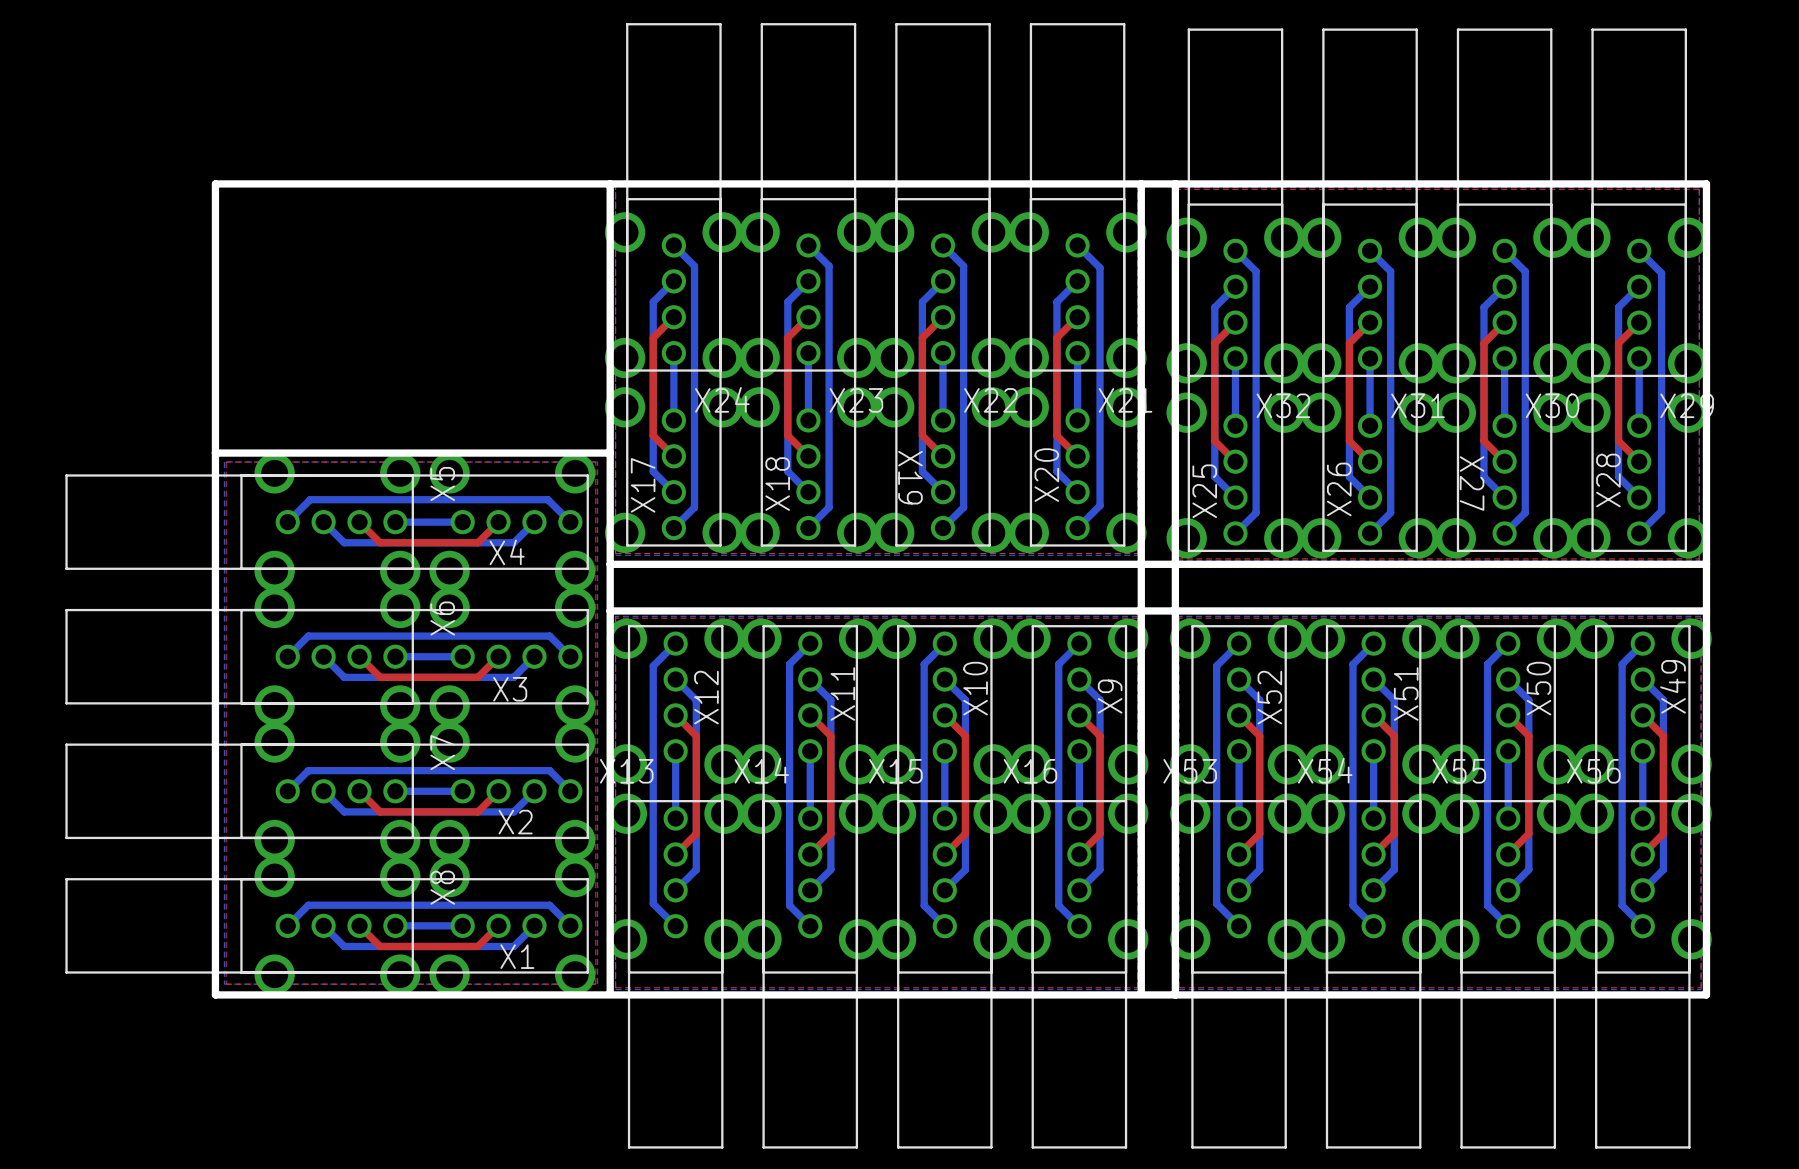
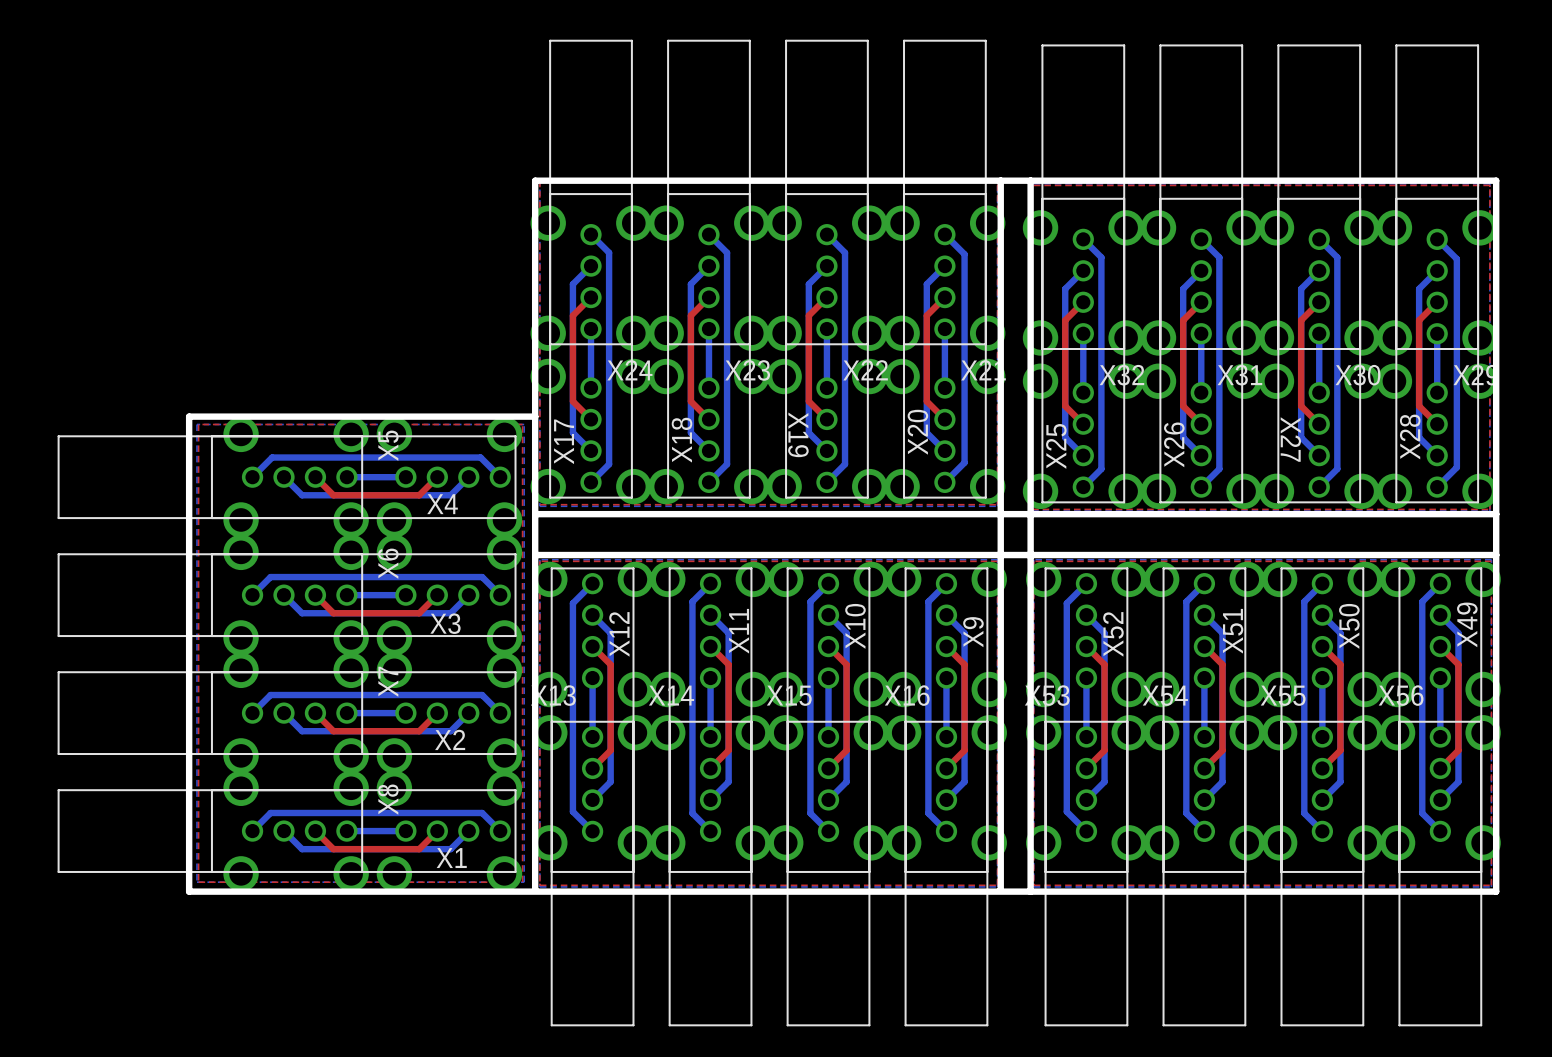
board edge: (610, 183) (215, 183) (215, 453) -> none

